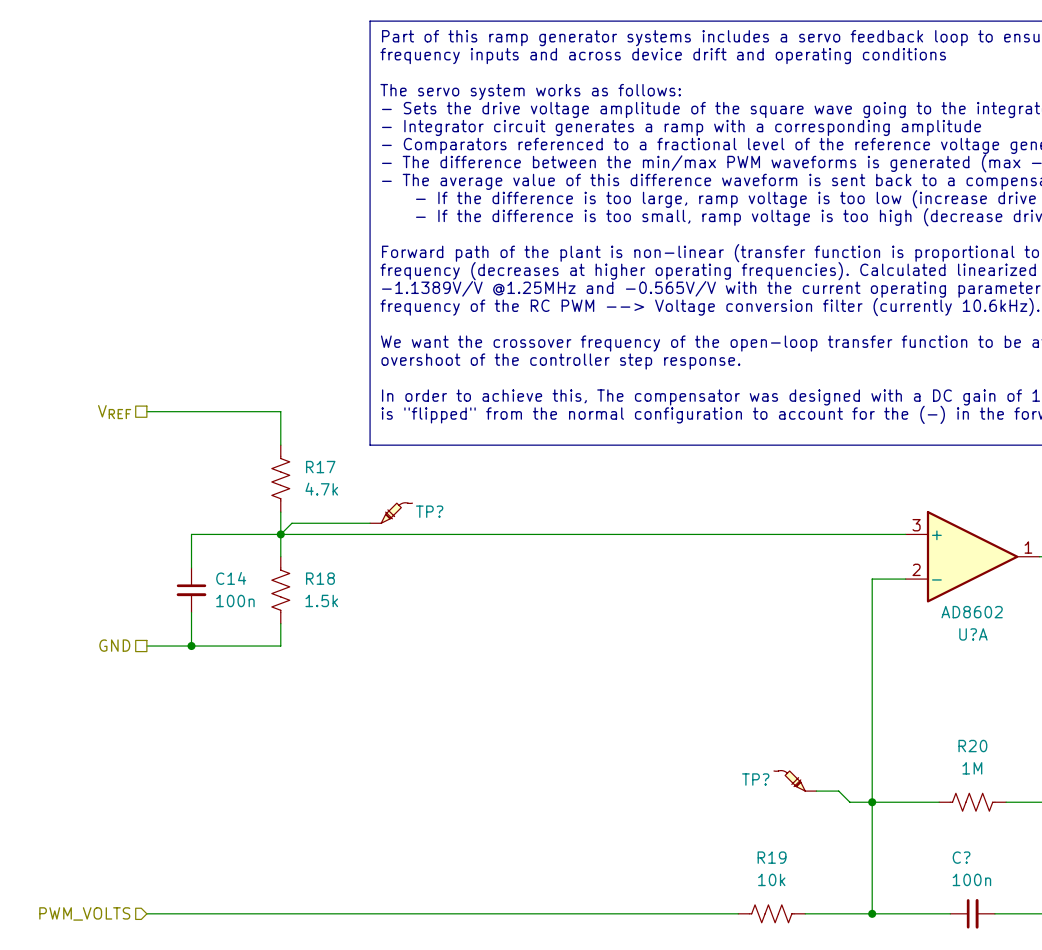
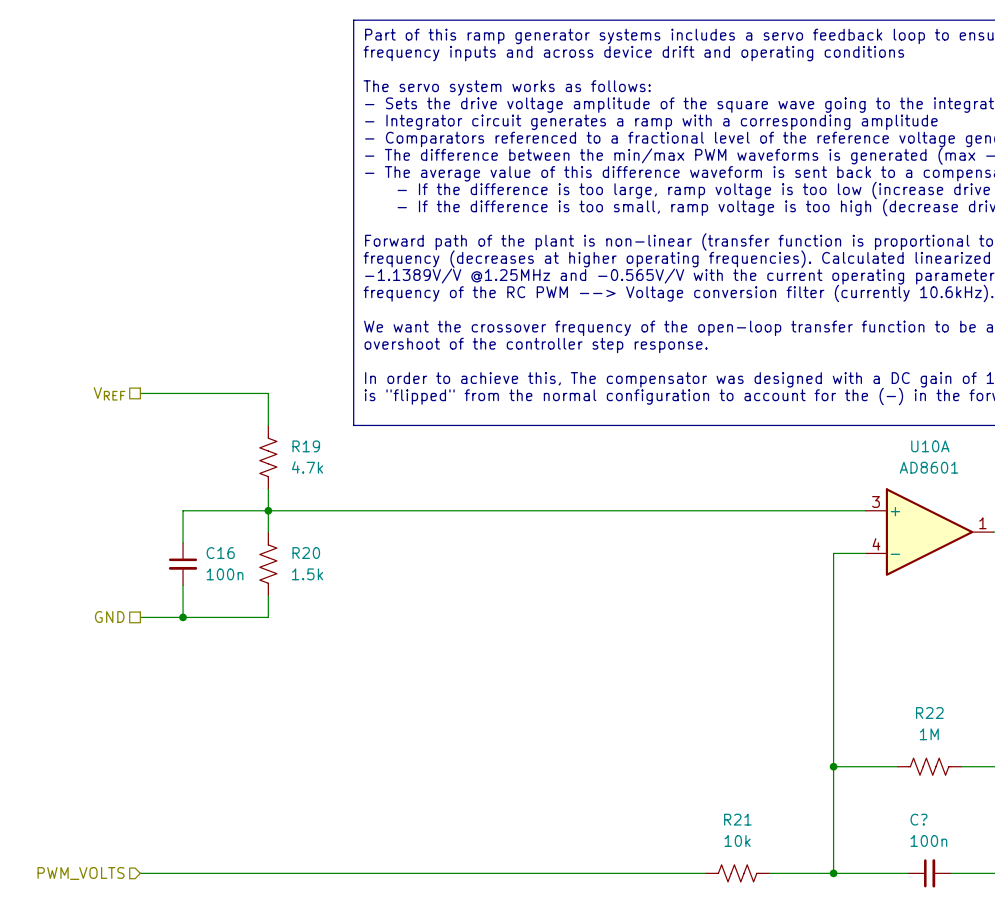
R17 name: R17 (320, 467) -> R19 (306, 446)
TP?: (391, 513) -> none
wire: (370, 523) (291, 523) (280, 534) -> none
U?A pin number: 2 (916, 569) -> 4 (876, 544)
C14 name: C14 (231, 578) -> C16 (220, 553)
R18 name: R18 (320, 578) -> R20 (306, 553)
U?A value: AD8602 (972, 612) -> AD8601 (929, 467)
U?A name: U?A (973, 634) -> U10A (930, 446)
R20 name: R20 (972, 746) -> R22 (929, 713)
TP?: (795, 780) -> none
wire: (816, 791) (838, 791) (849, 802) (872, 802) -> none
R19 name: R19 (772, 857) -> R21 (737, 819)

